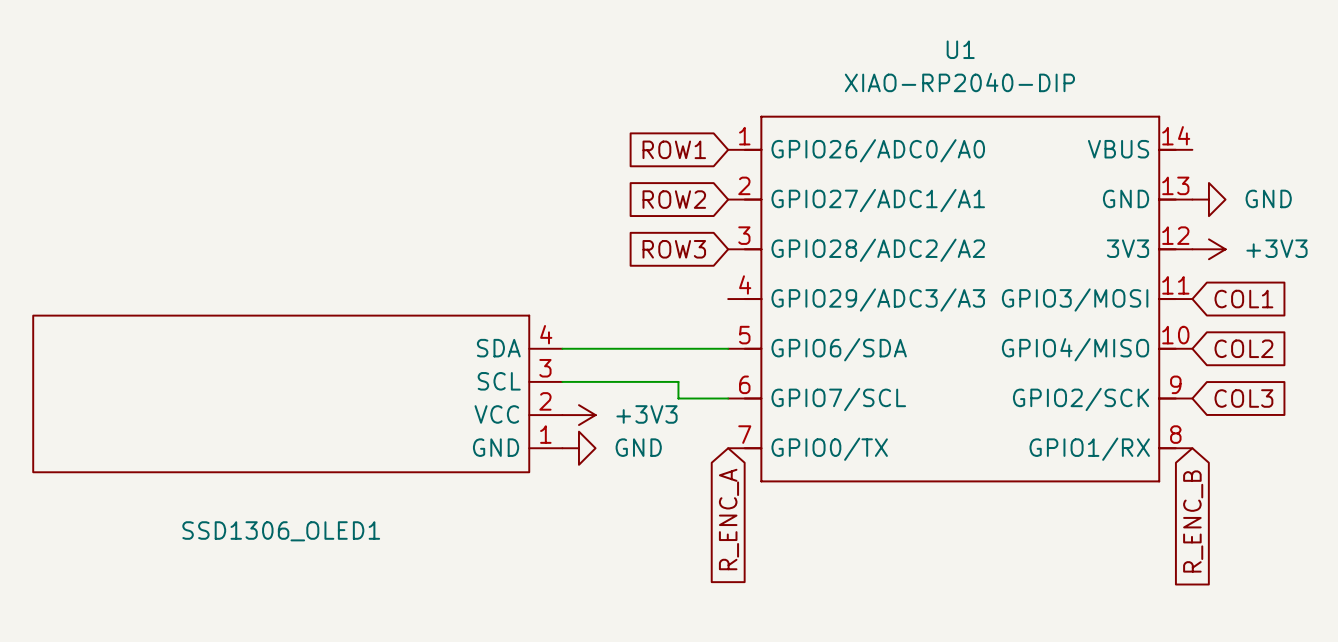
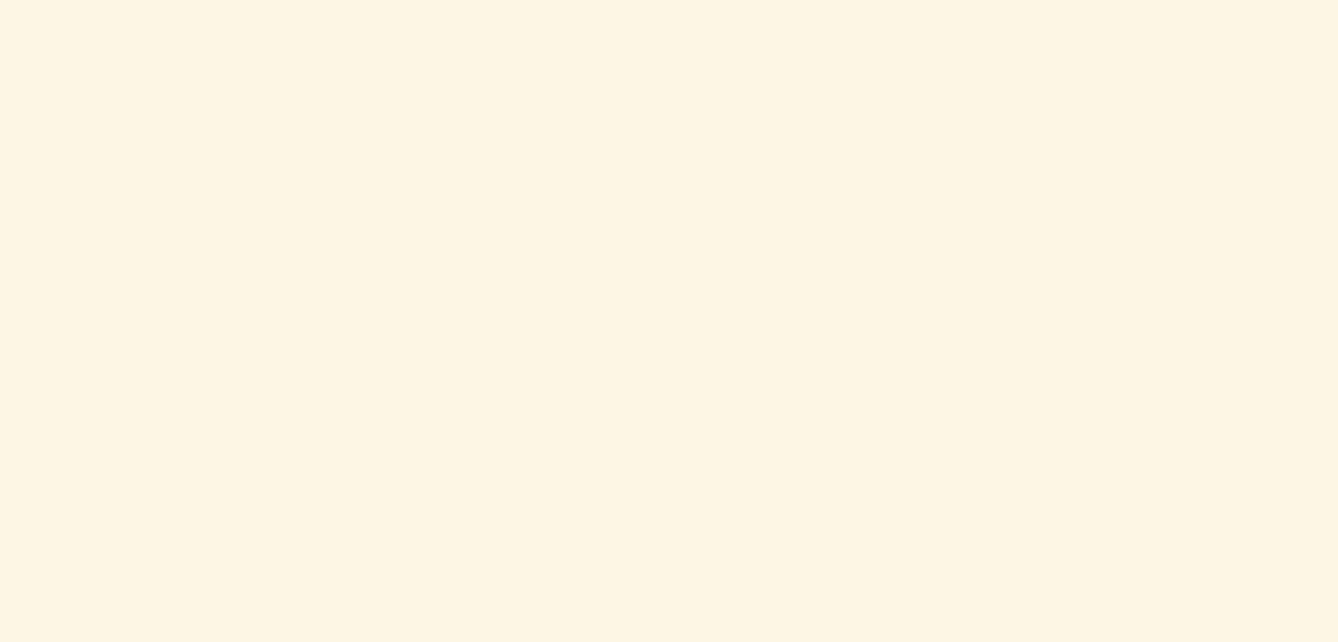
global label: ROW1 (674, 149) -> none
global label: ROW2 (674, 199) -> none
power symbol: GND (1208, 199) -> none
global label: ROW3 (674, 249) -> none
power symbol: +3V3 (1208, 249) -> none
U1: XIAO-RP2040-DIP (960, 299) -> none
global label: COL1 (1243, 299) -> none
wire: (562, 348) (728, 348) -> none
global label: COL2 (1243, 348) -> none
wire: (562, 381) (678, 381) (678, 398) (728, 398) -> none
SSD1306_OLED1: (297, 393) -> none
global label: COL3 (1243, 398) -> none
power symbol: +3V3 (578, 415) -> none
power symbol: GND (578, 448) -> none
global label: R_ENC_A (728, 519) -> none
global label: R_ENC_B (1193, 521) -> none

